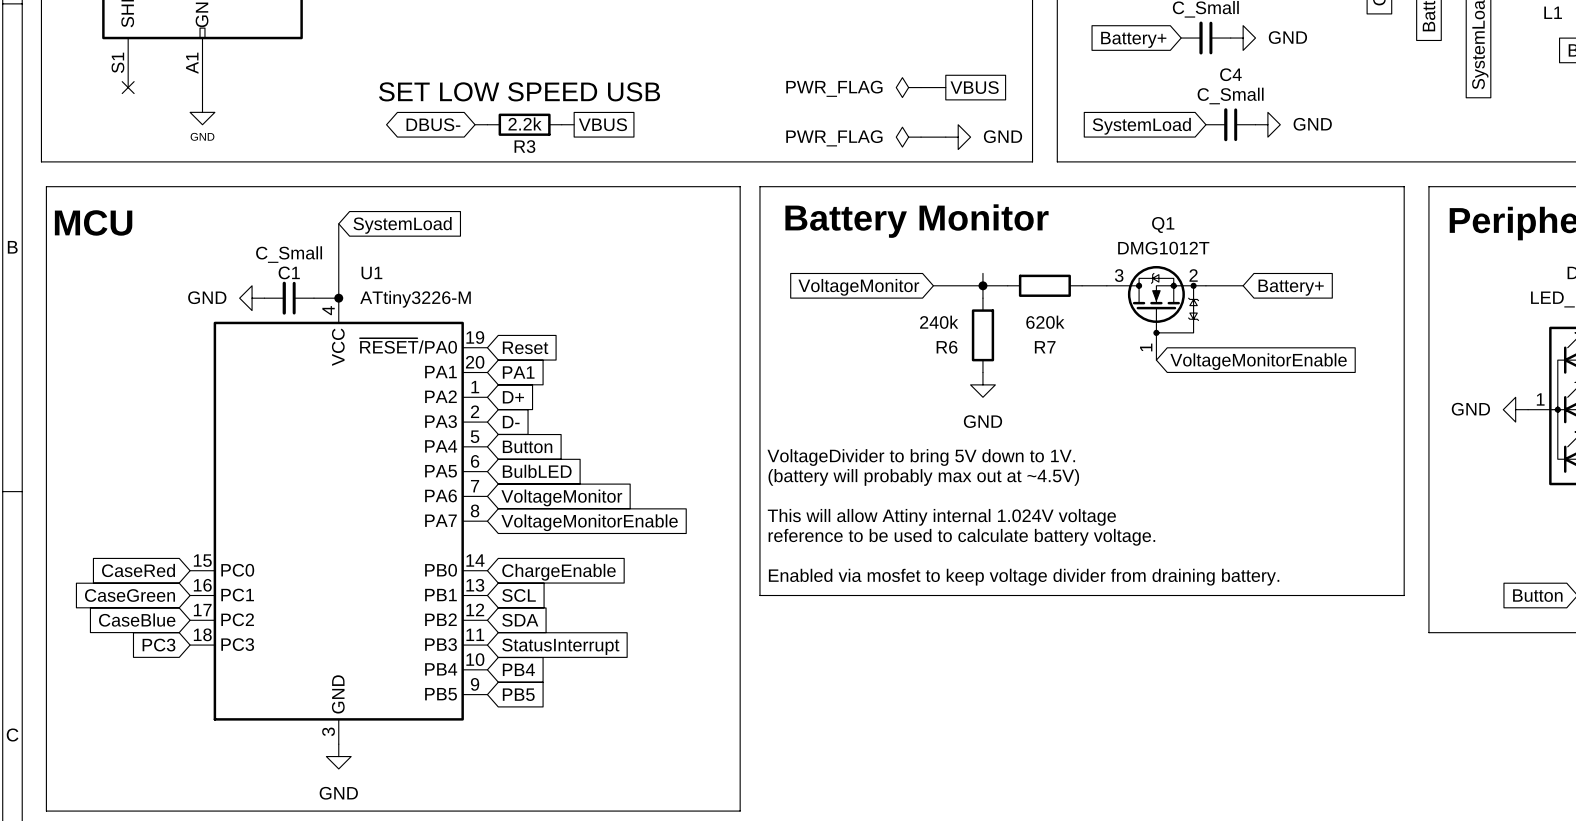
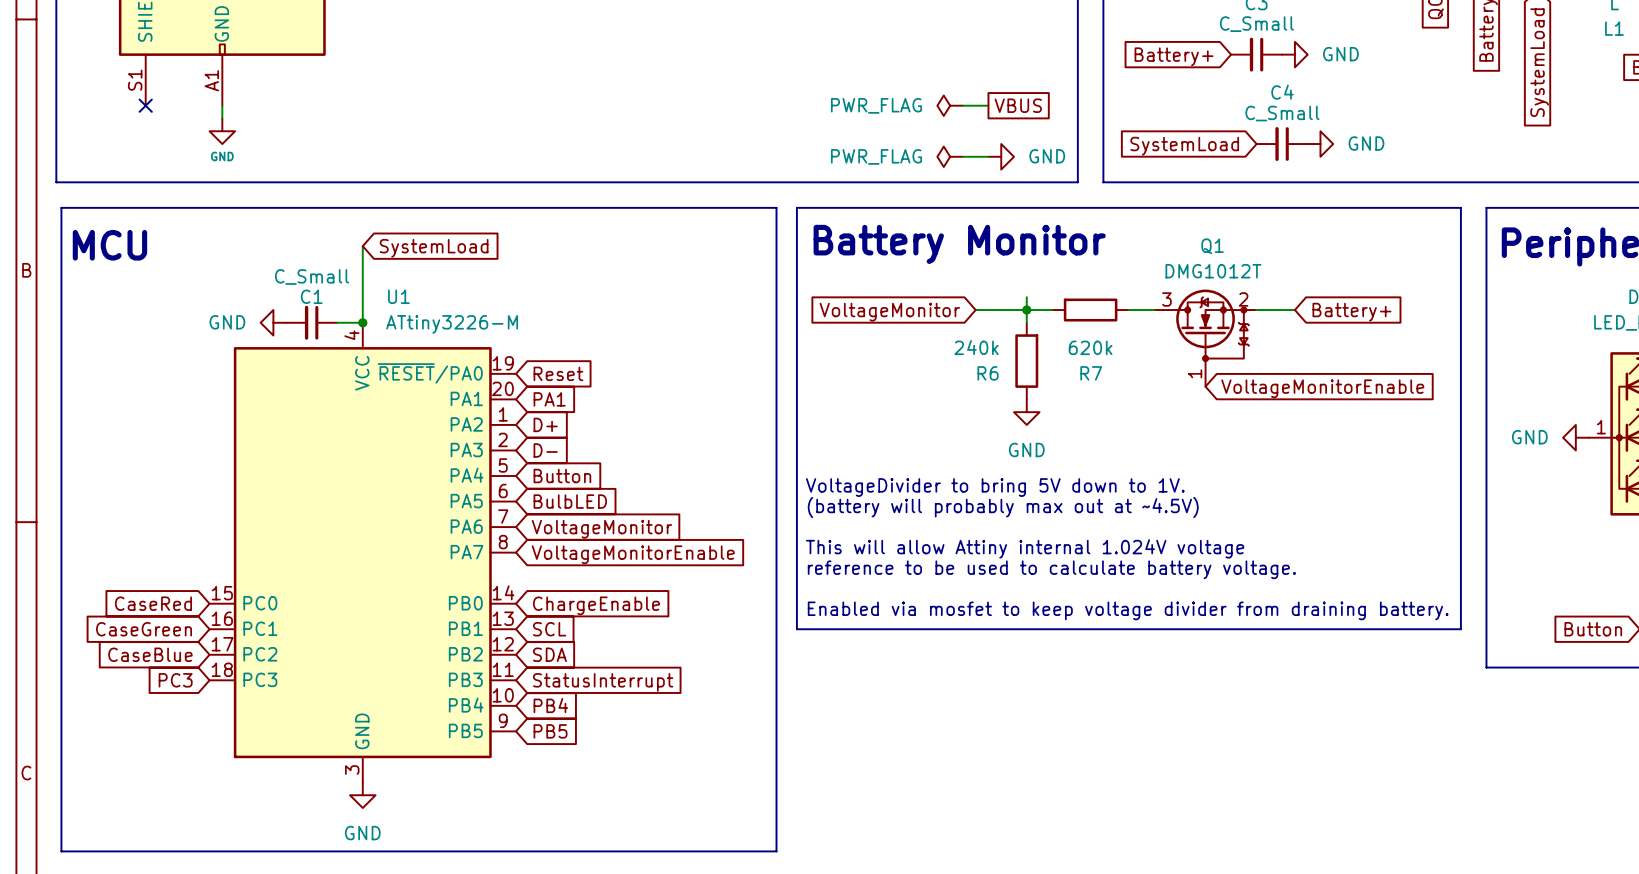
text: SET LOW SPEED USB (519, 91) -> none
global label: DBUS- (433, 124) -> none
wire: (475, 124) (487, 124) -> none
R3: 2.2k (524, 124) -> none
wire: (561, 124) (574, 124) -> none
global label: VBUS (602, 124) -> none

